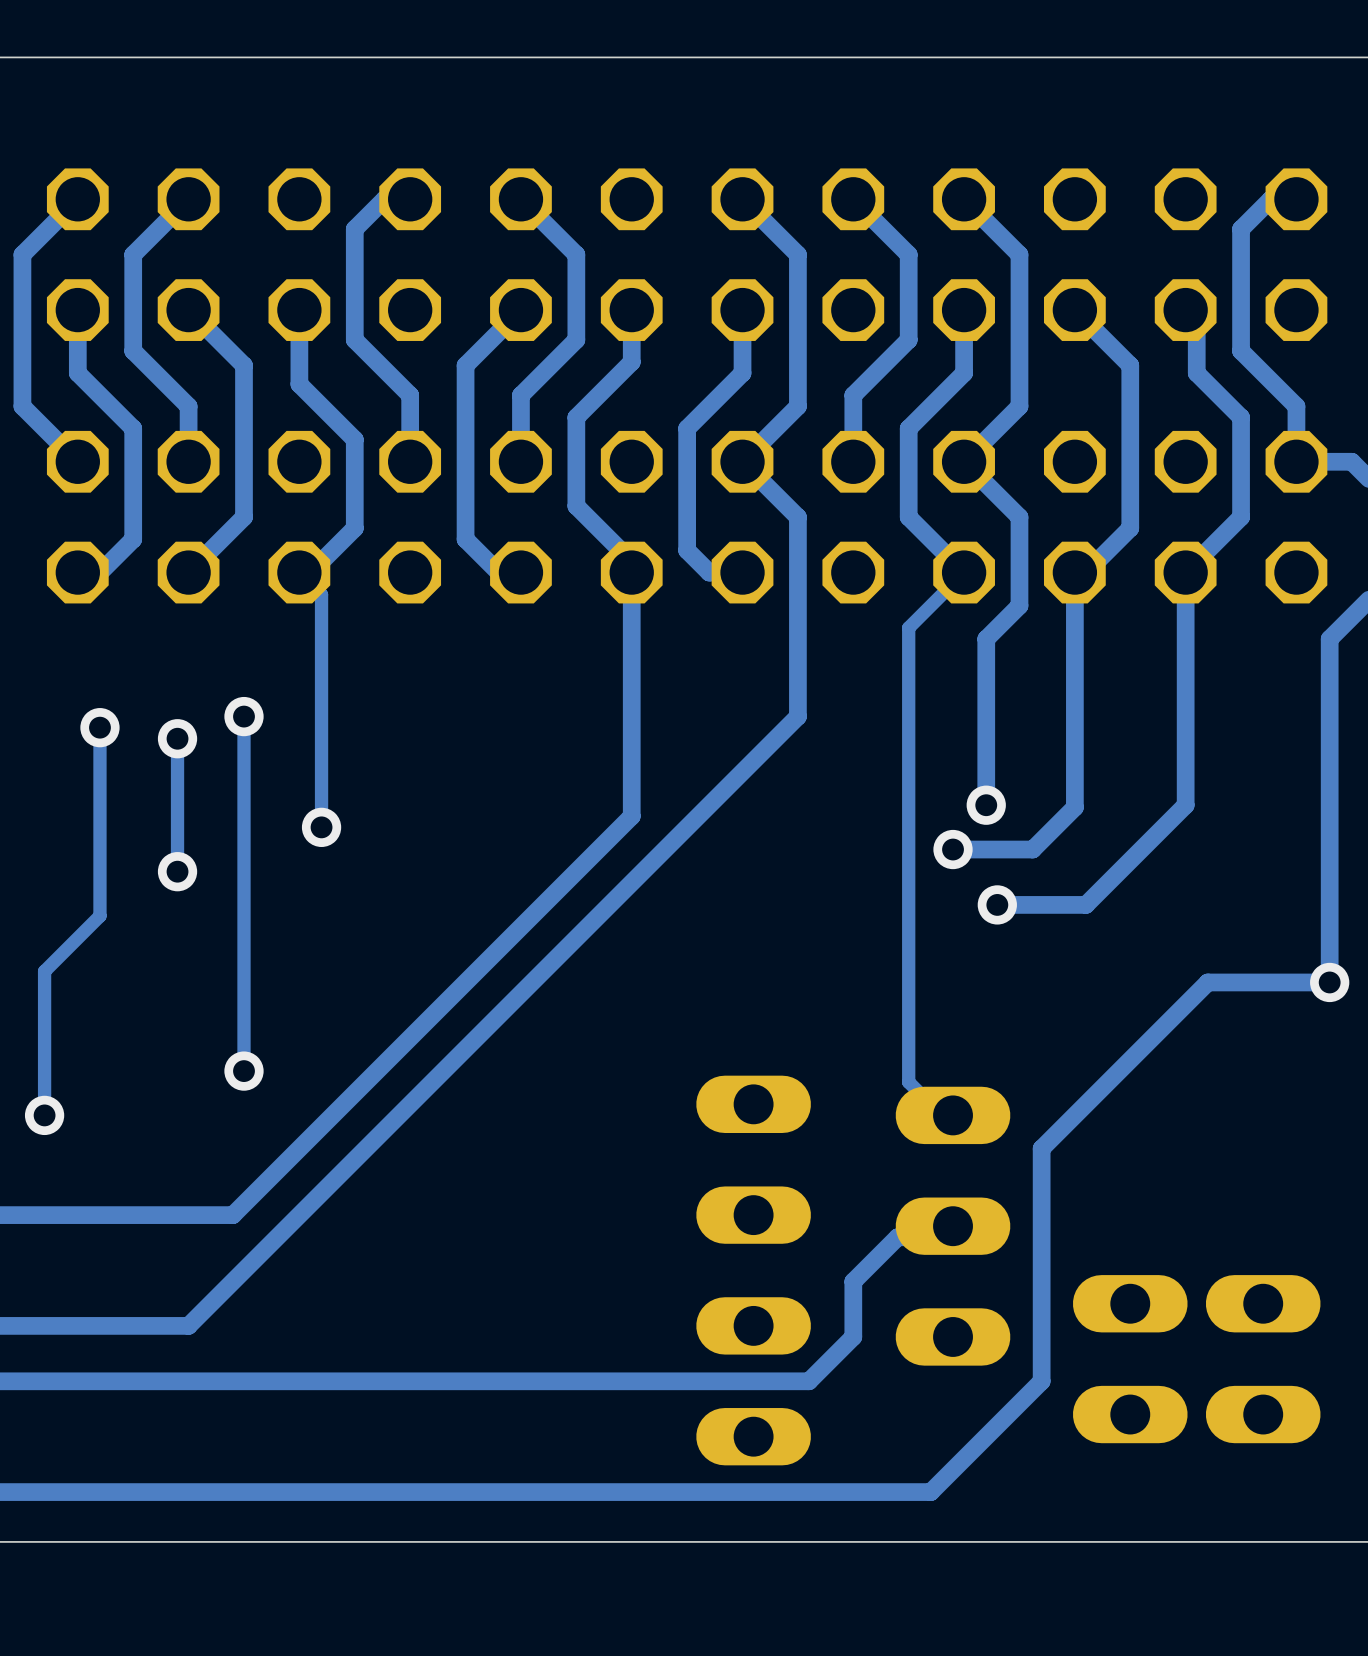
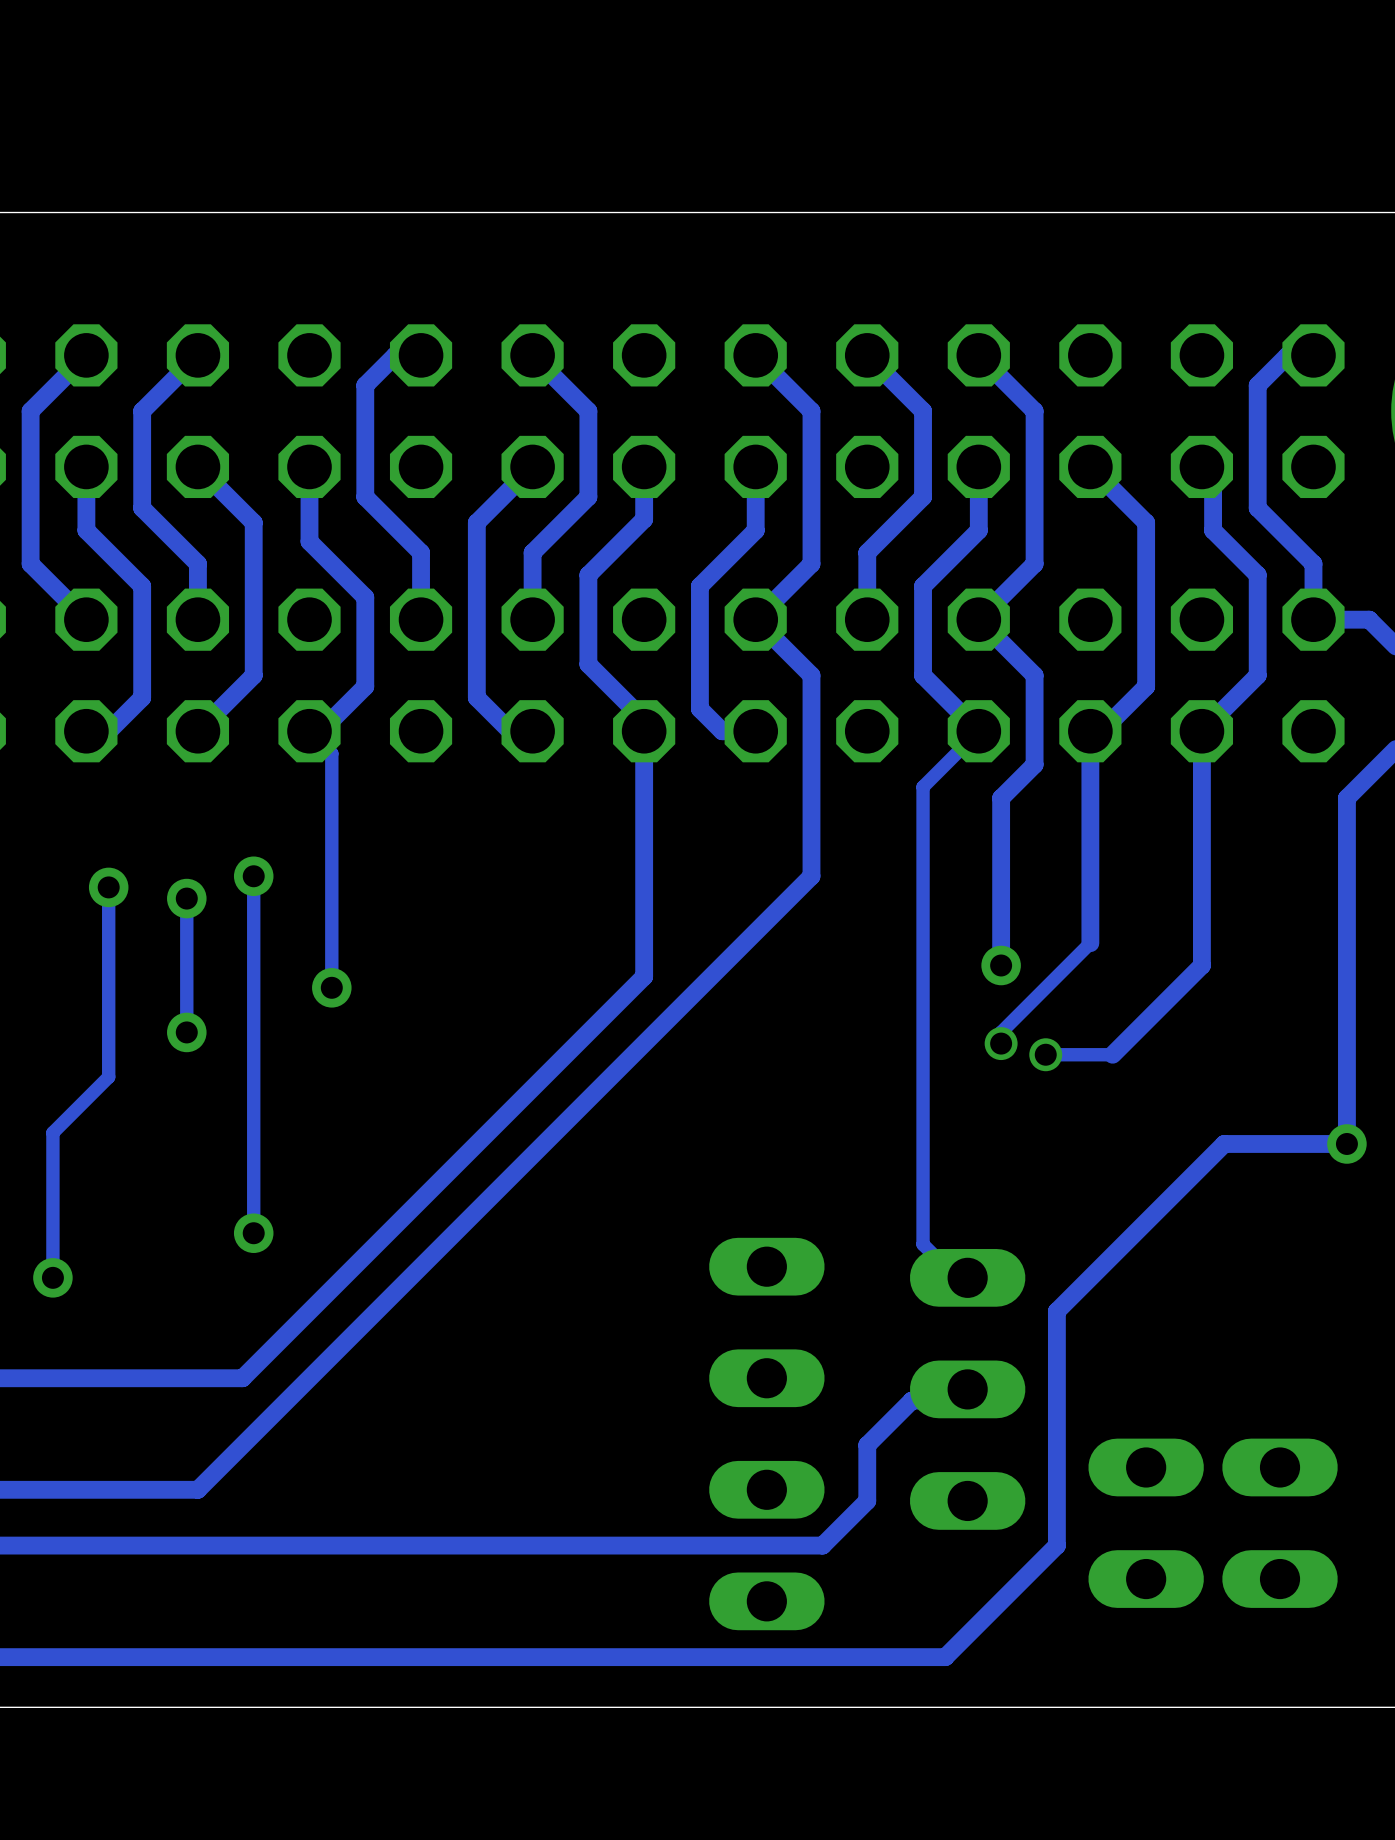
track: (1074, 783) (1074, 807) (1032, 849) (953, 849) -> (1090, 943) (1001, 1032) (1001, 1043)
via: (953, 849) -> none
via: none -> (1001, 1043)
via: none -> (1045, 1054)
track: (1097, 893) (1085, 904) (997, 904) -> (1112, 1054) (1045, 1054)
via: (997, 904) -> none

